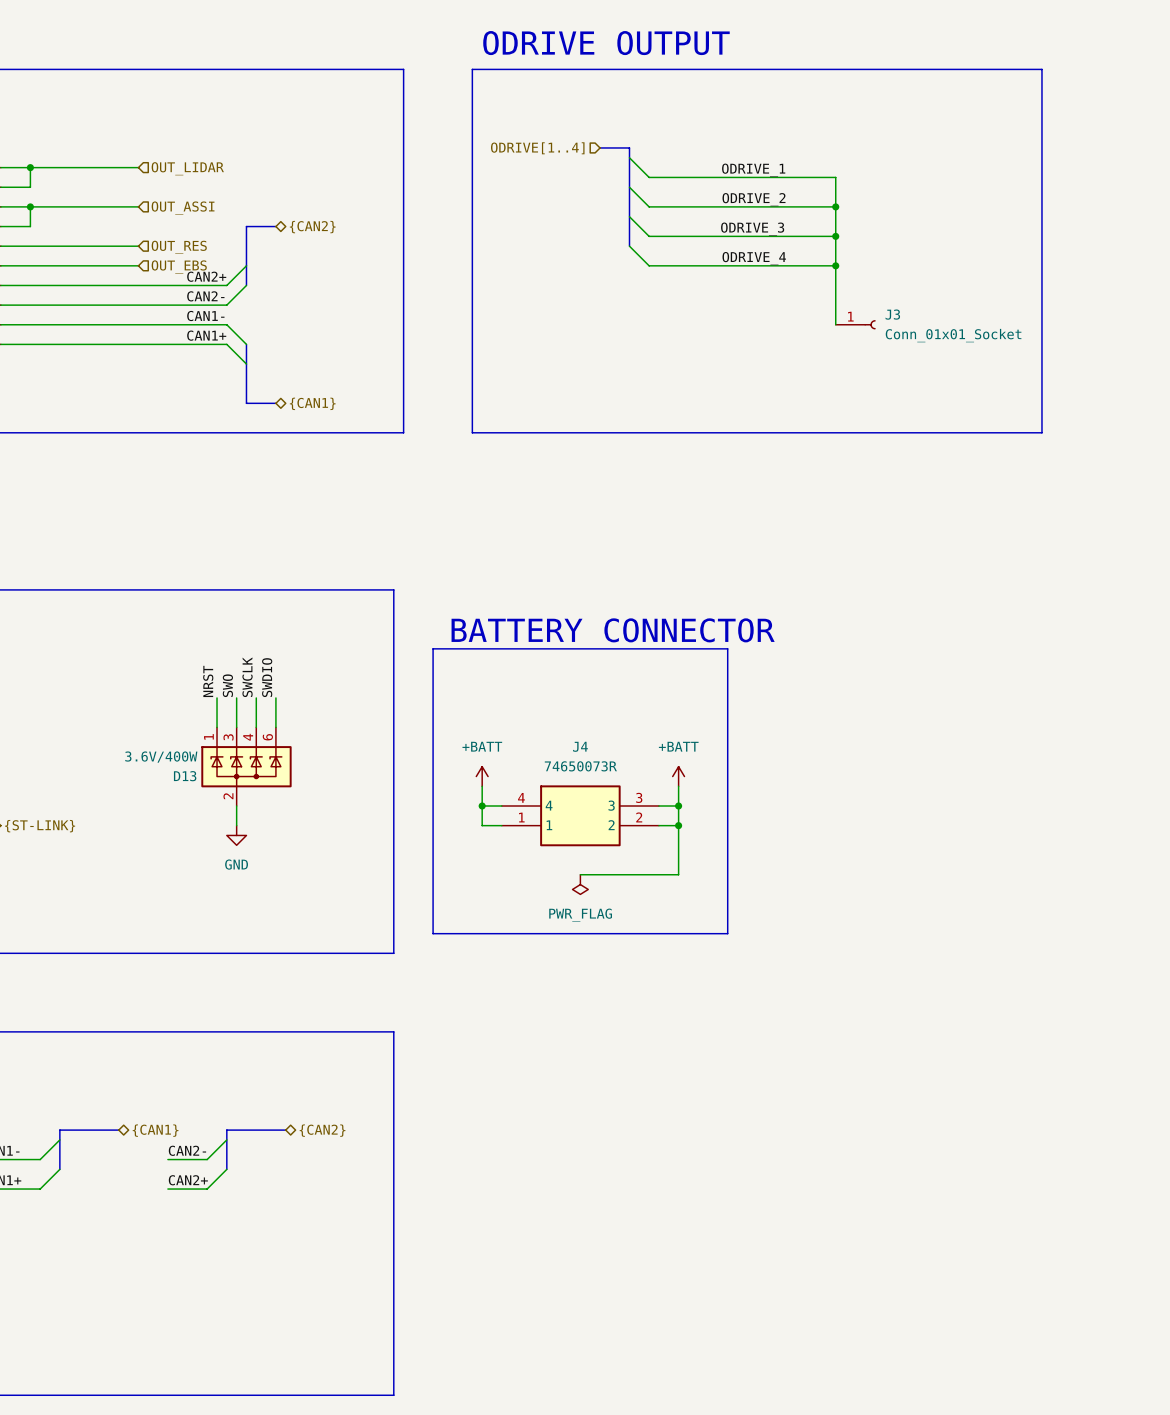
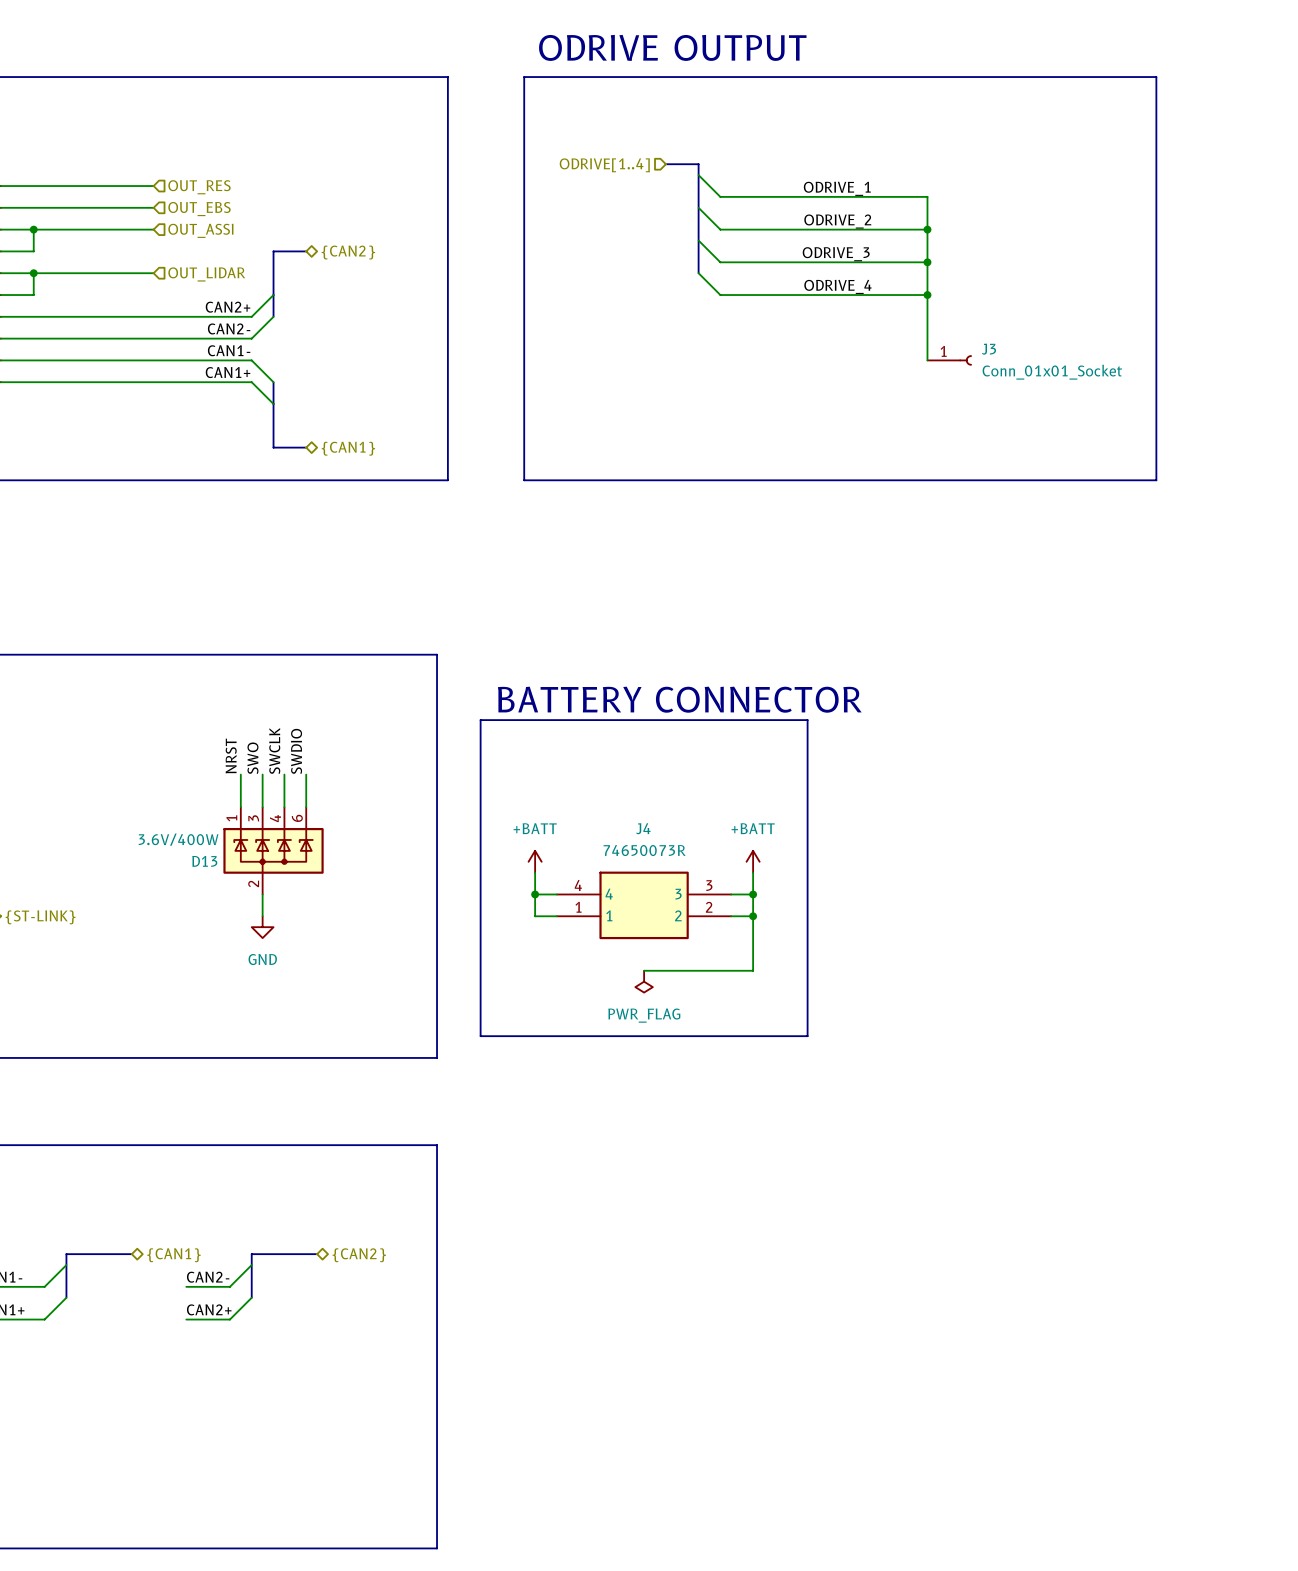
wire: (30, 167) (30, 187) -> (153, 207) (33, 207)
junction: (30, 167) -> none
hierarchical label: OUT_LIDAR (187, 168) -> OUT_RES (199, 187)
junction: none -> (33, 273)
hierarchical label: OUT_RES (179, 247) -> OUT_LIDAR (206, 274)
wire: (30, 265) (138, 265) -> (33, 295) (33, 273)
hierarchical label position: OUT_EBS (179, 266) -> OUT_EBS (199, 209)

